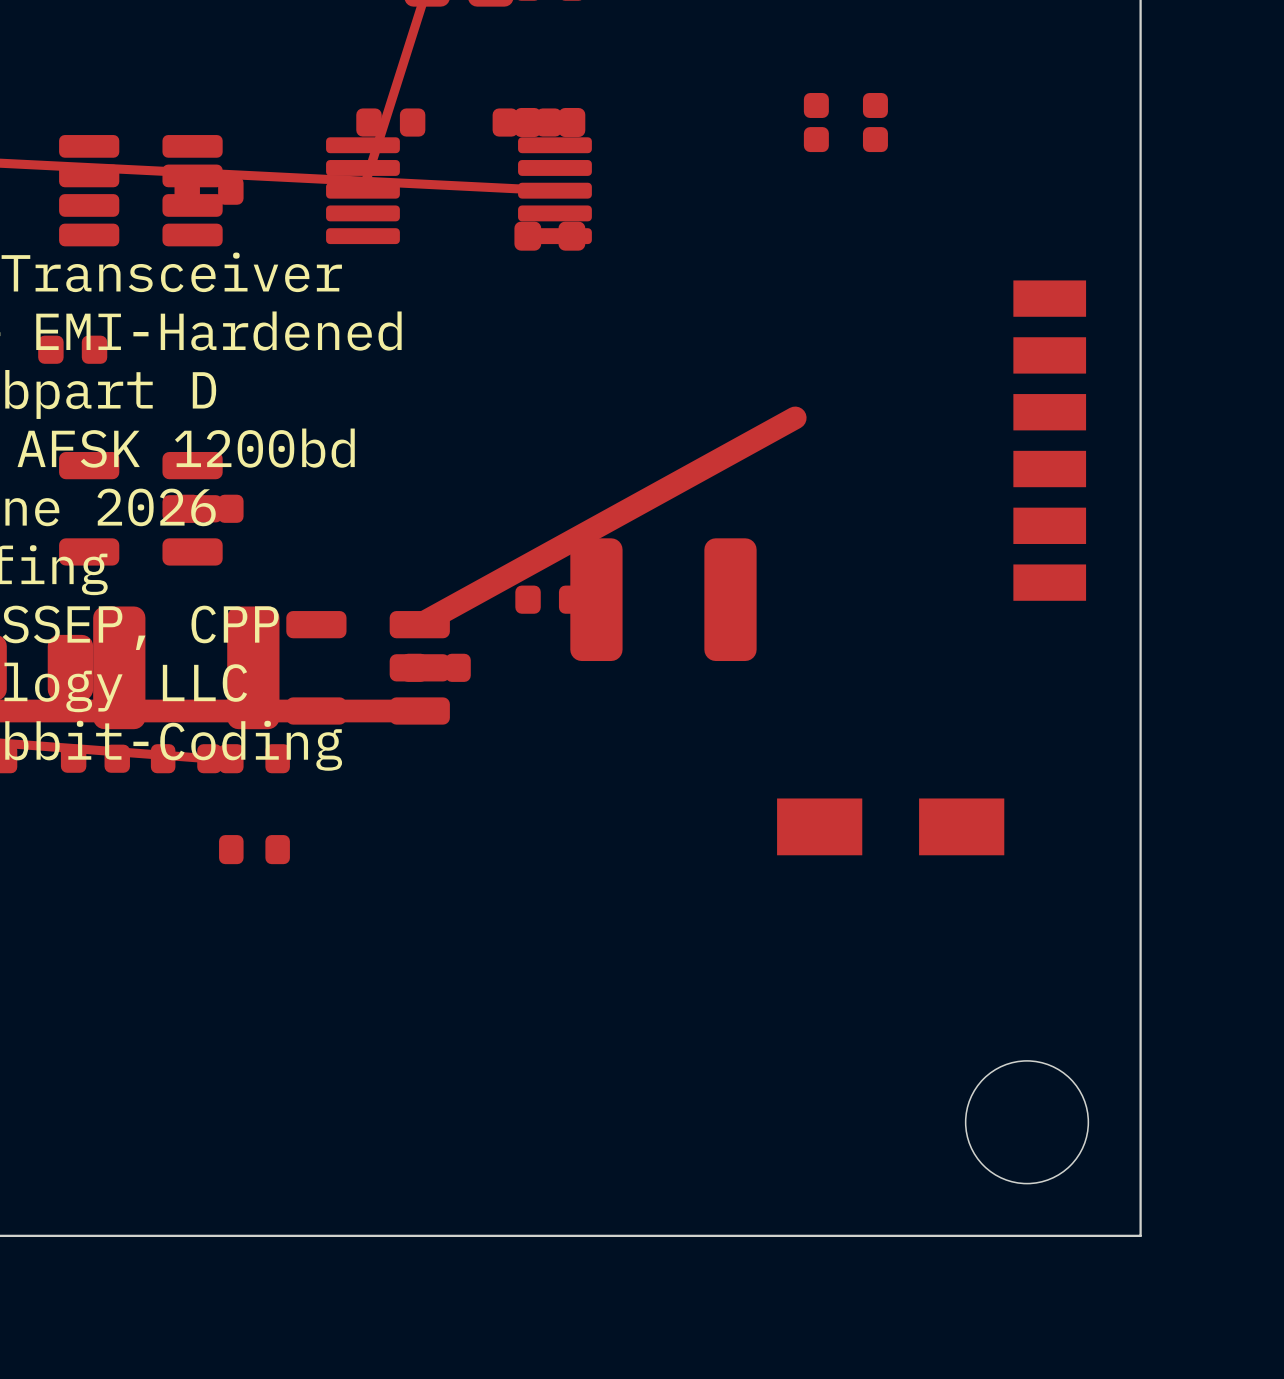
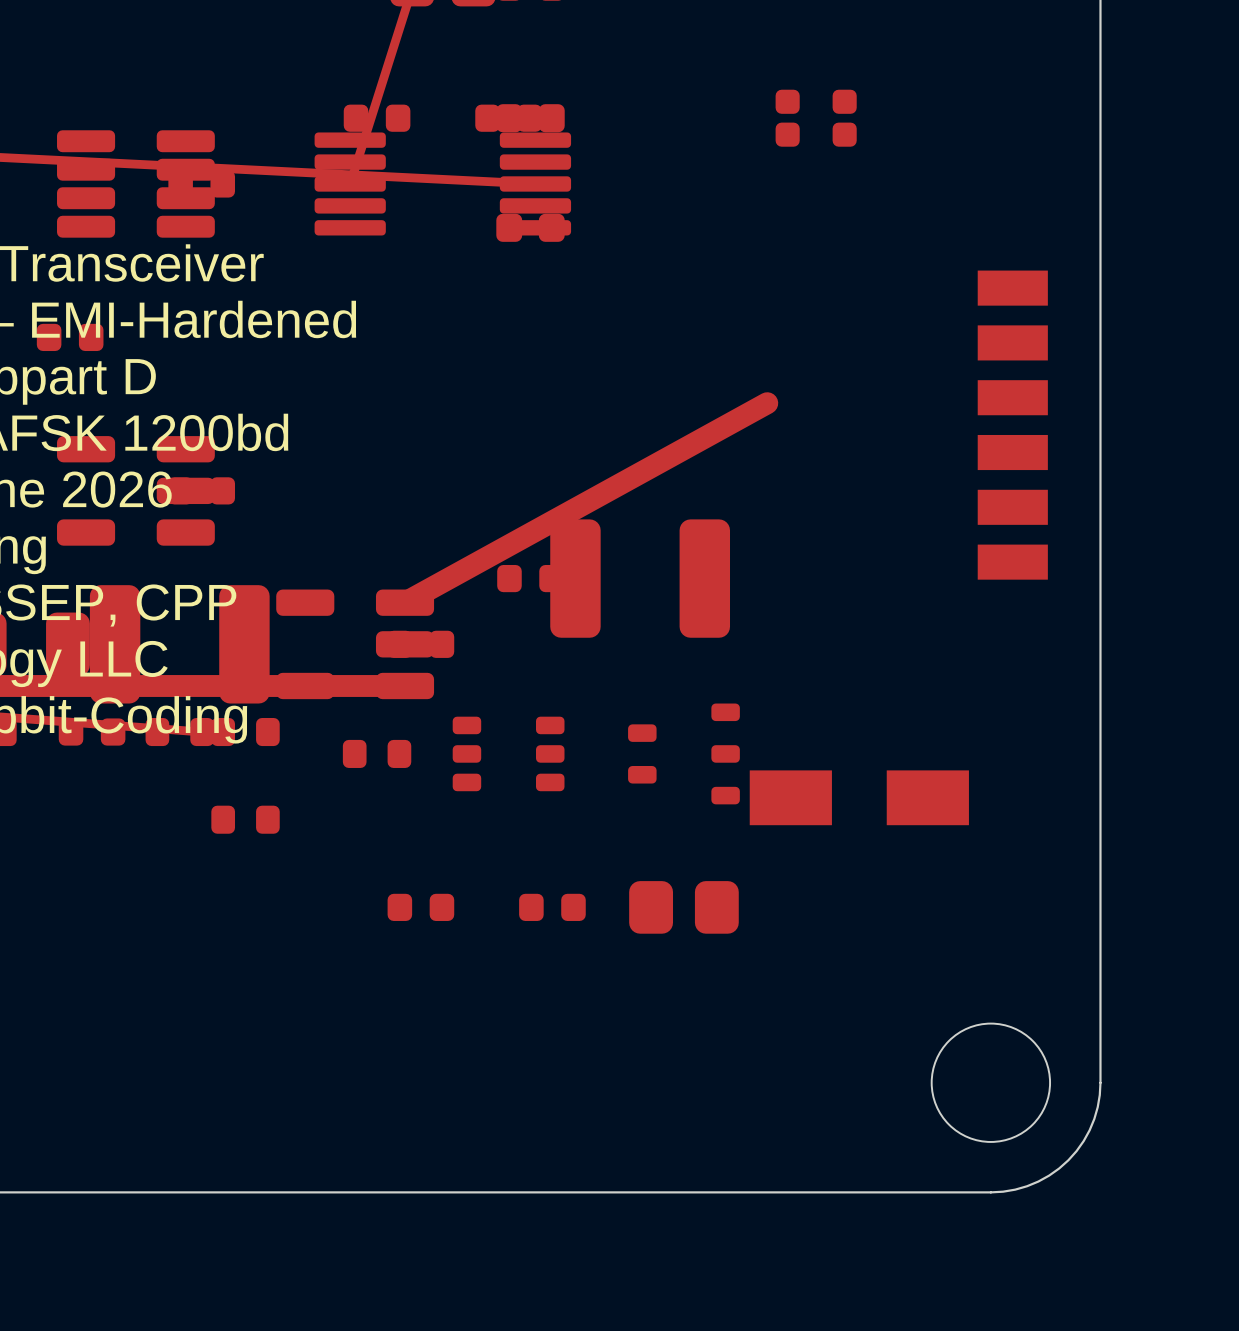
part: none -> (377, 753)
part: none -> (508, 753)
part: none -> (683, 753)
part: none -> (420, 907)
part: none -> (552, 907)
part: none -> (683, 907)
board edge: (1140, 1122) (1140, 1235) (1027, 1235) -> (1100, 1082) (1097, 1107) (1089, 1130) (1068, 1160) (1049, 1175) (1027, 1186) (990, 1192)

